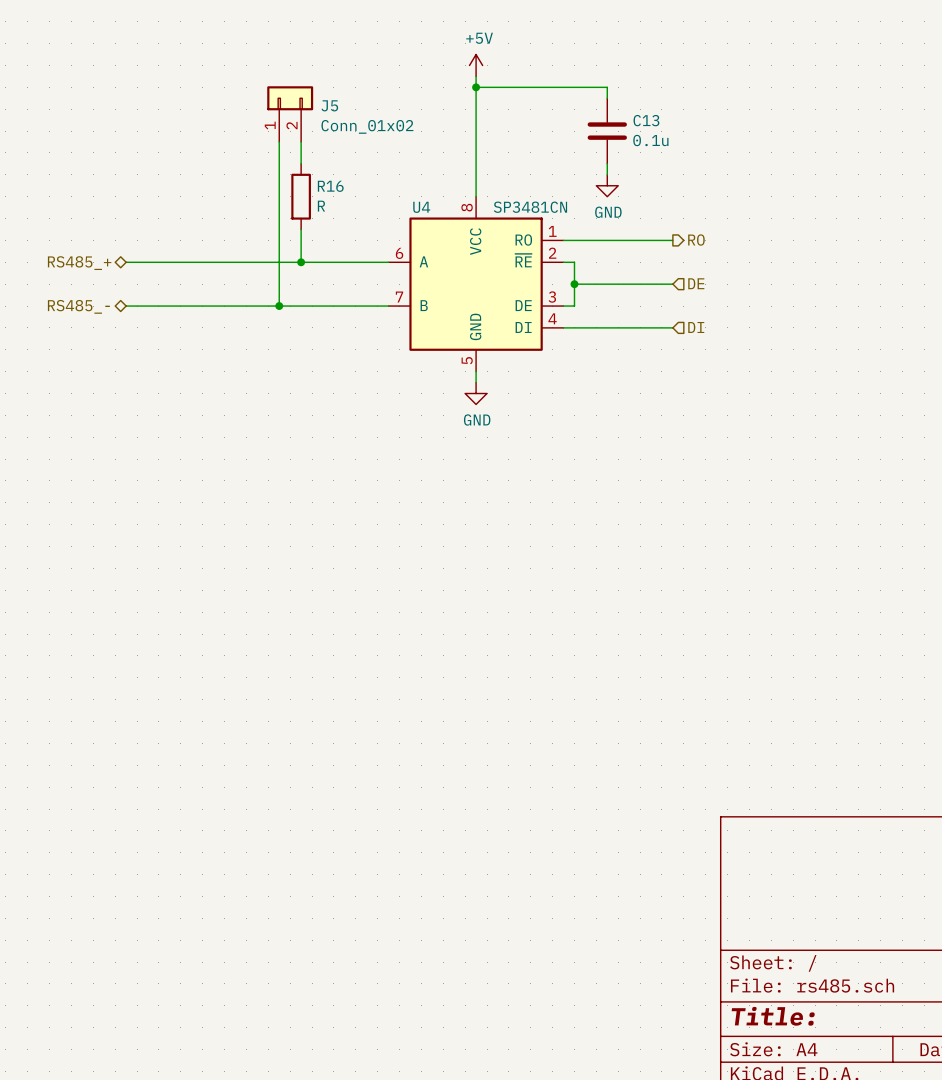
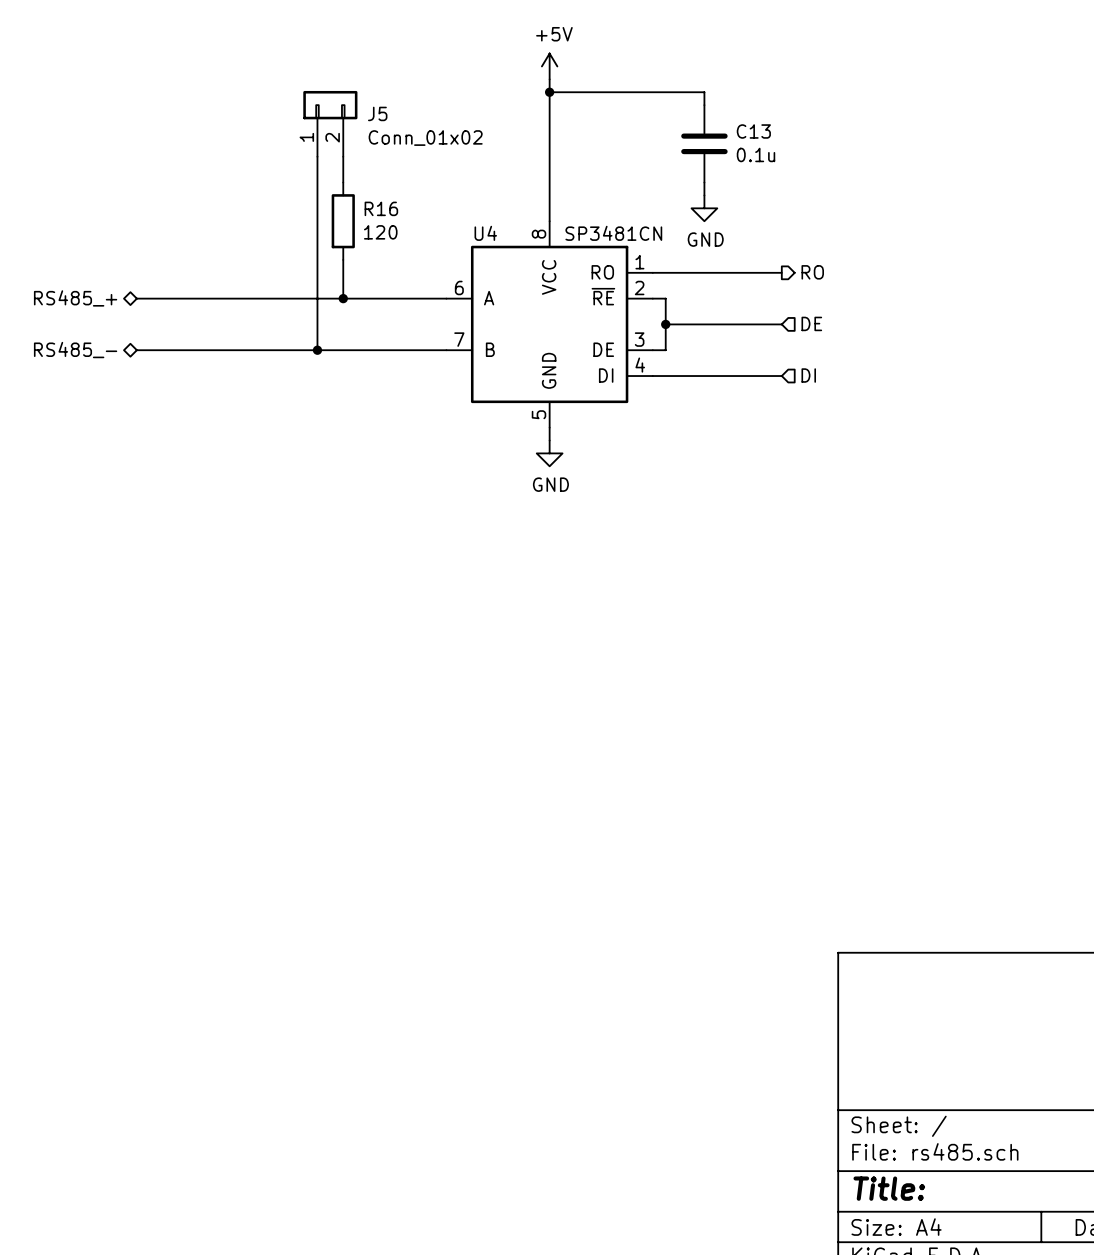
R16 value: R (321, 206) -> 120 (380, 232)

